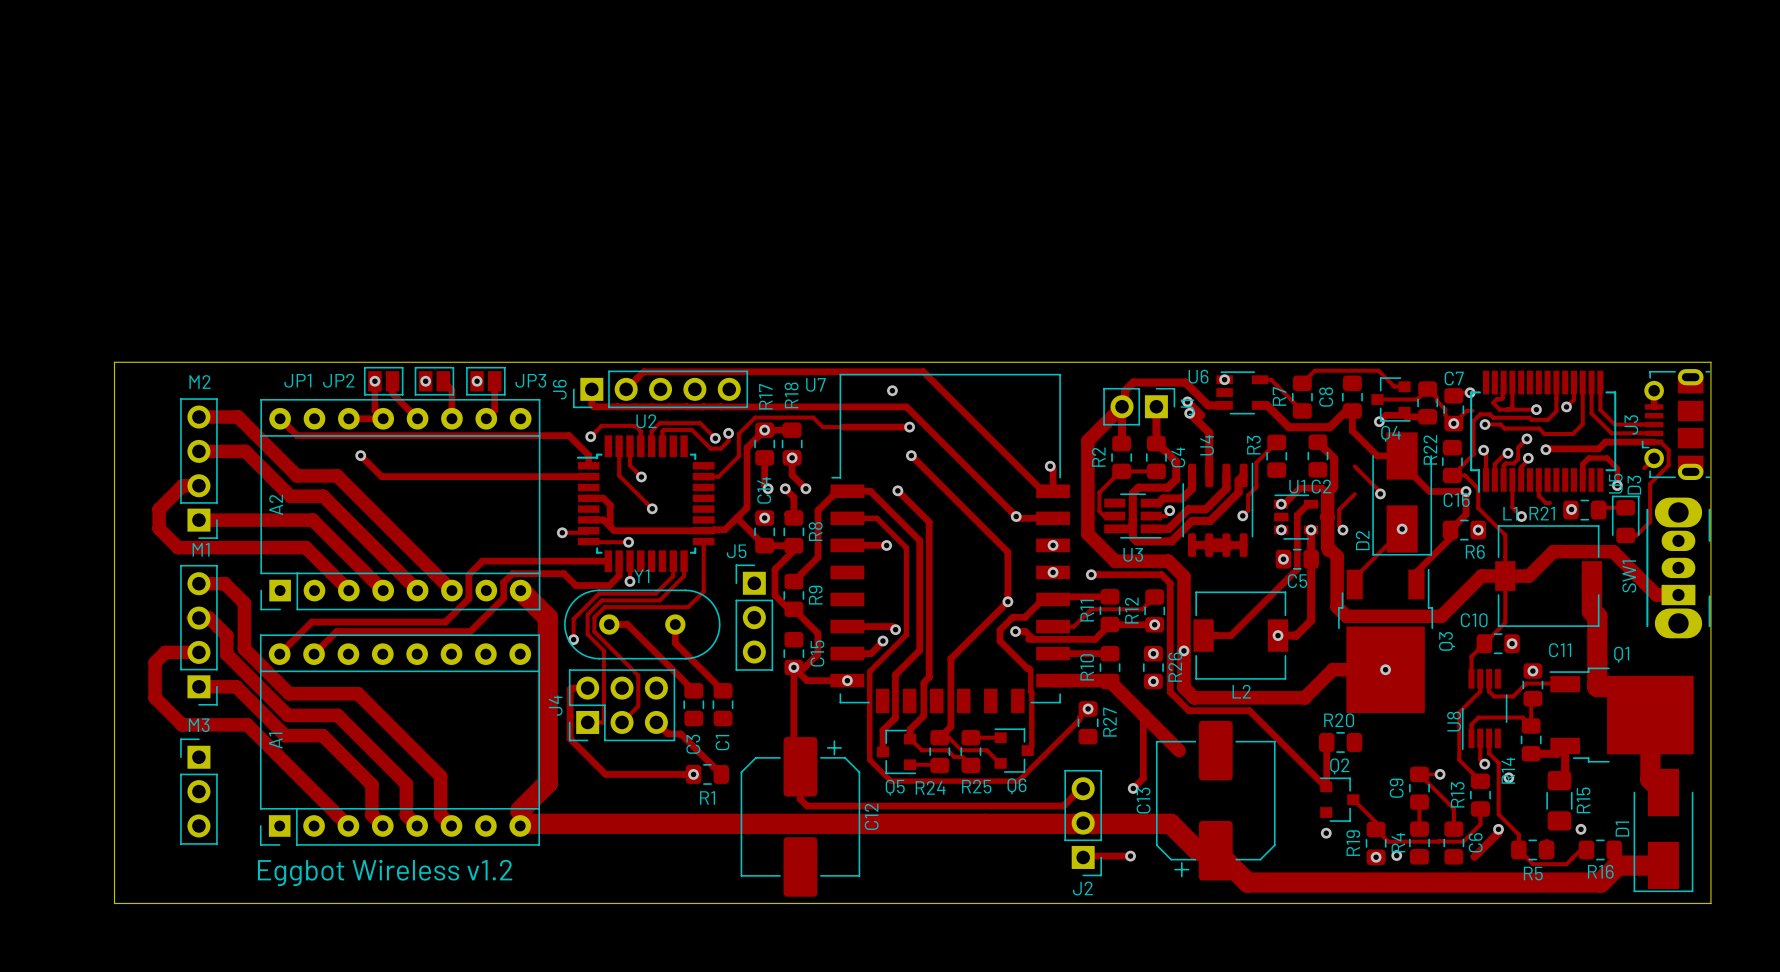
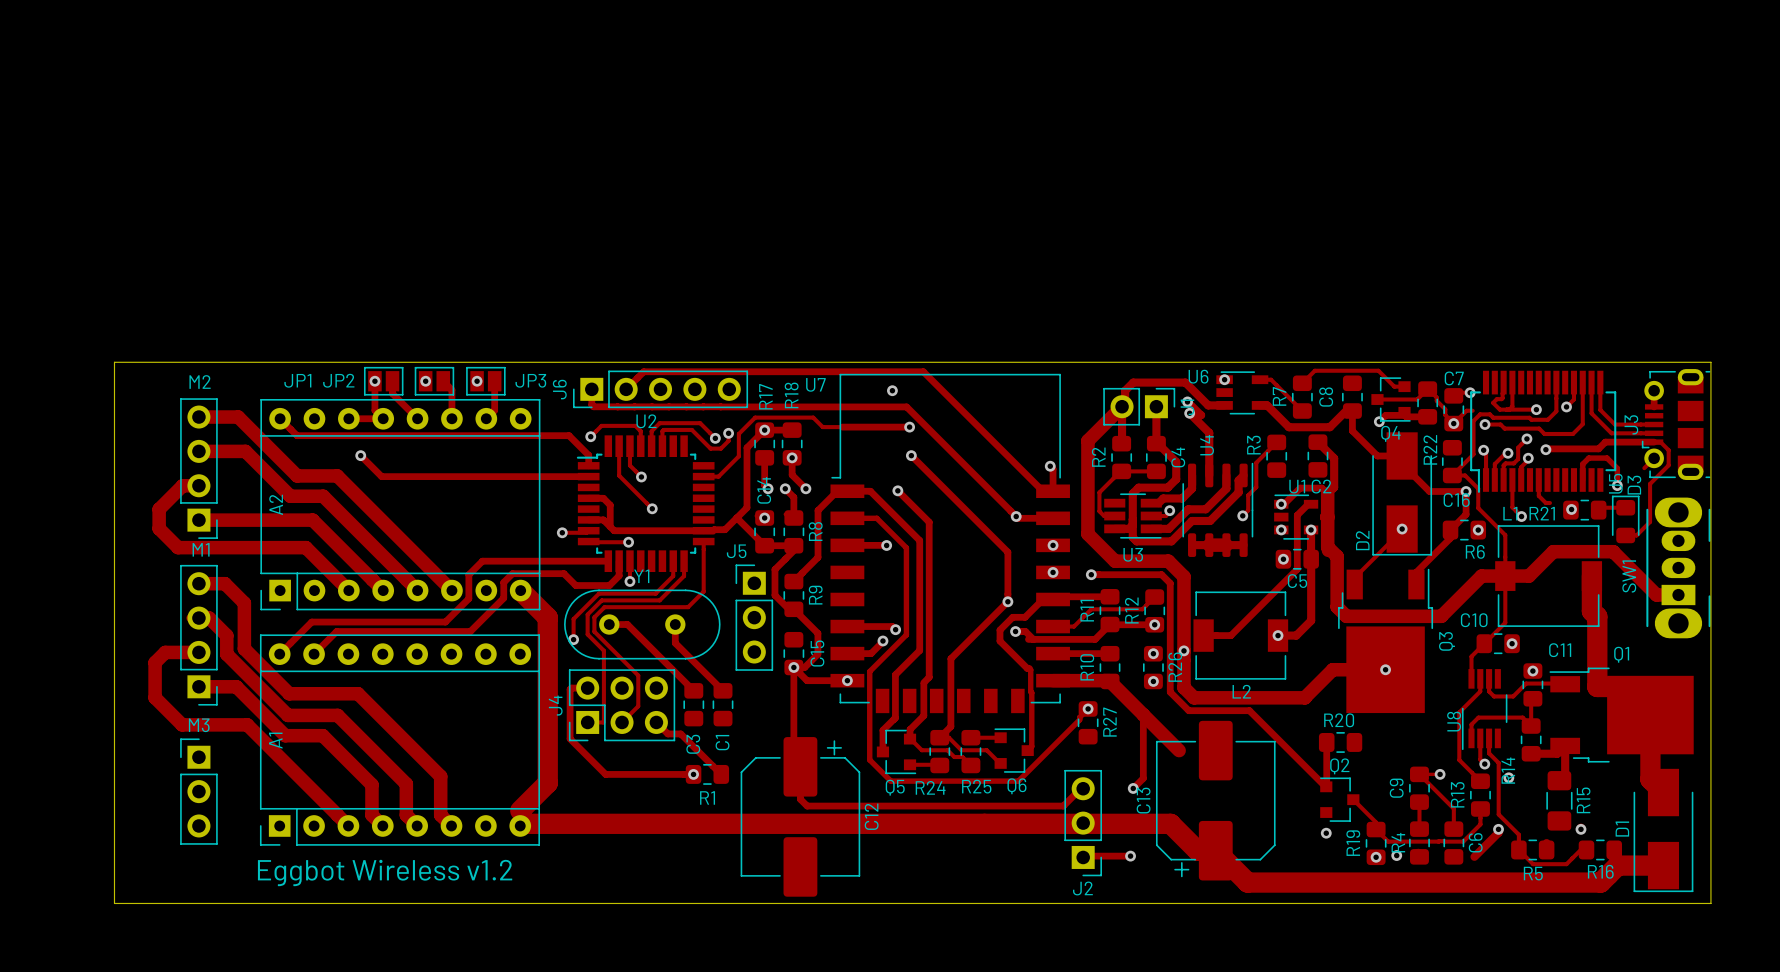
track: (1354, 466) (1380, 493) -> none
via: (1380, 493) -> none
track: (1354, 494) (1339, 509) (1339, 526) (1342, 530) -> none
via: (1342, 530) -> none

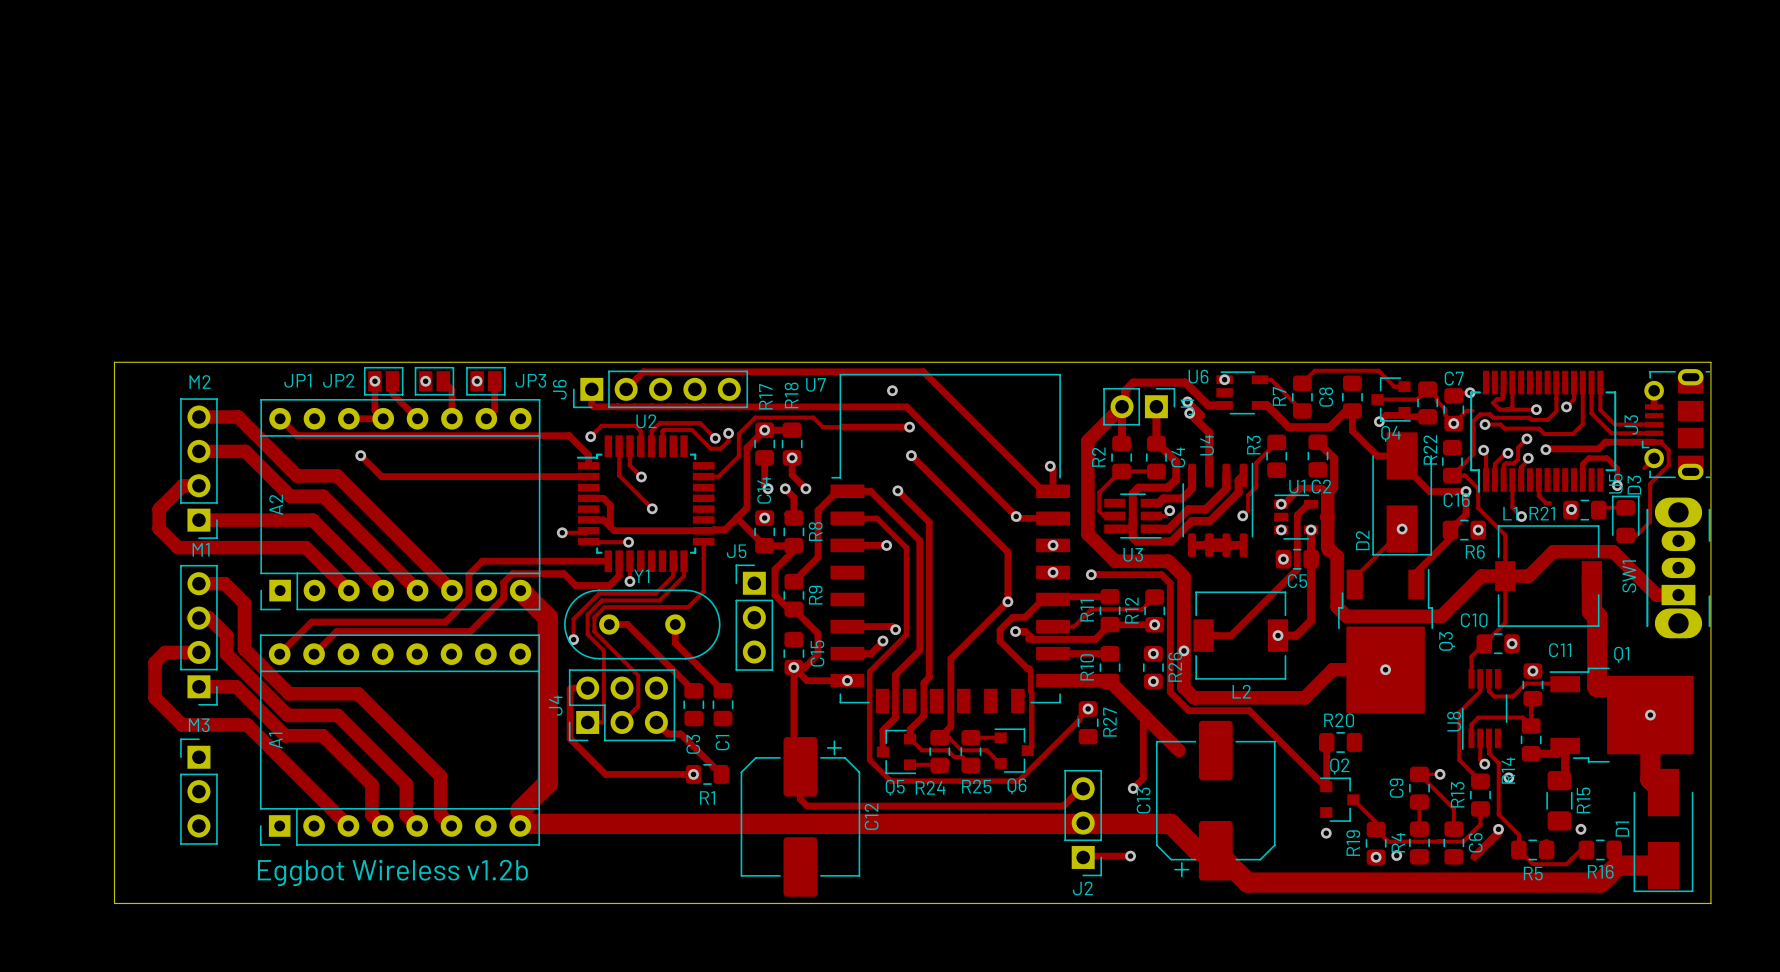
via: none -> (1650, 715)
text: Eggbot Wireless v1.2 (385, 872) -> Eggbot Wireless v1.2b (392, 872)

